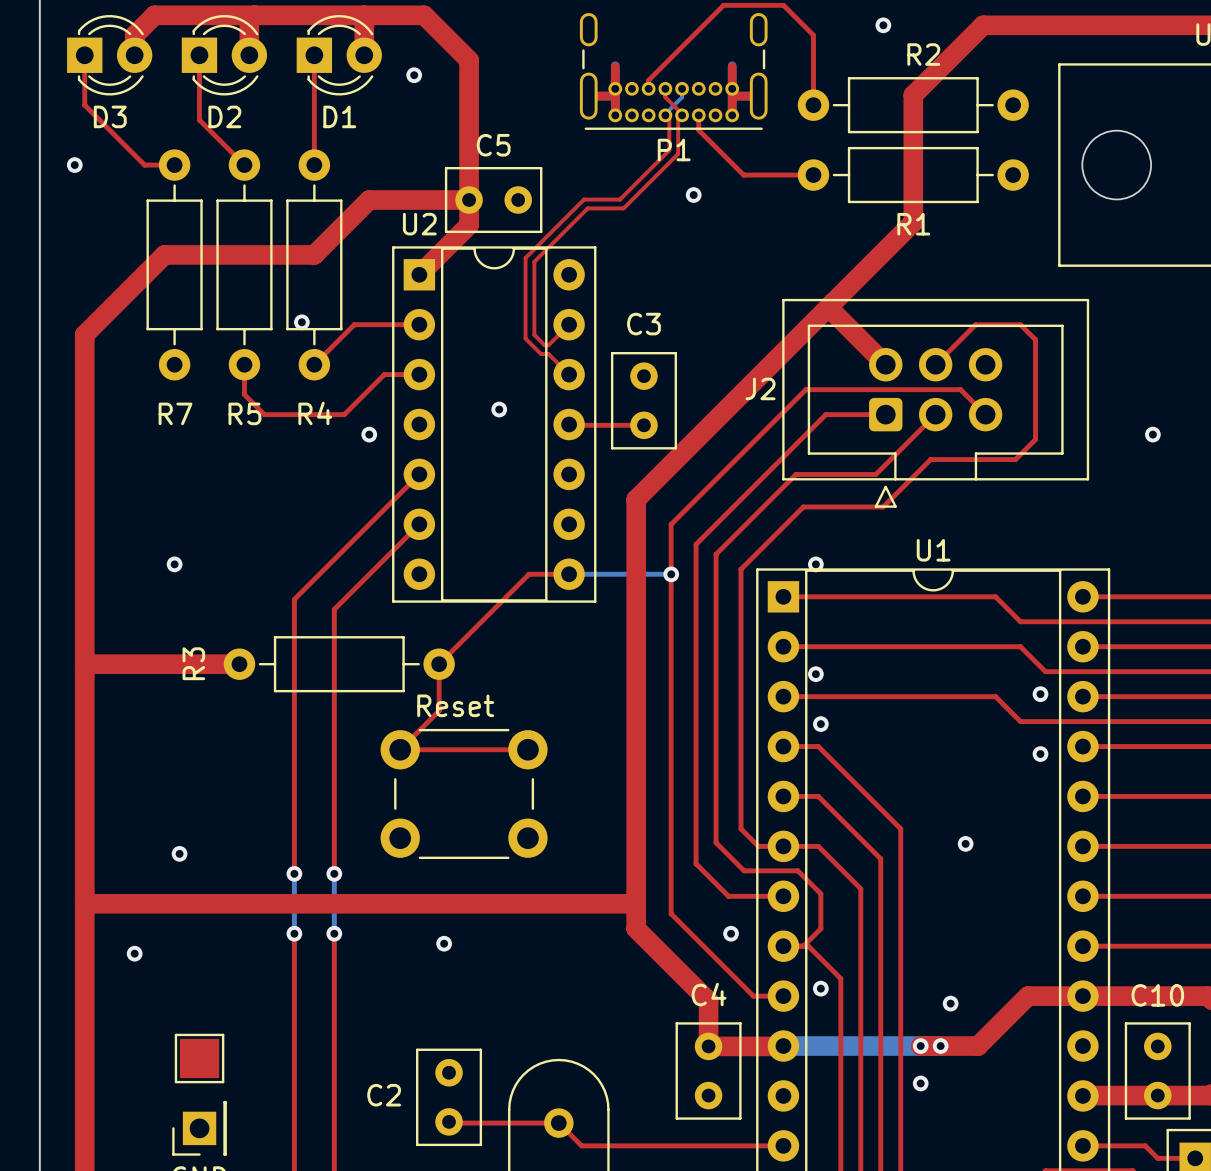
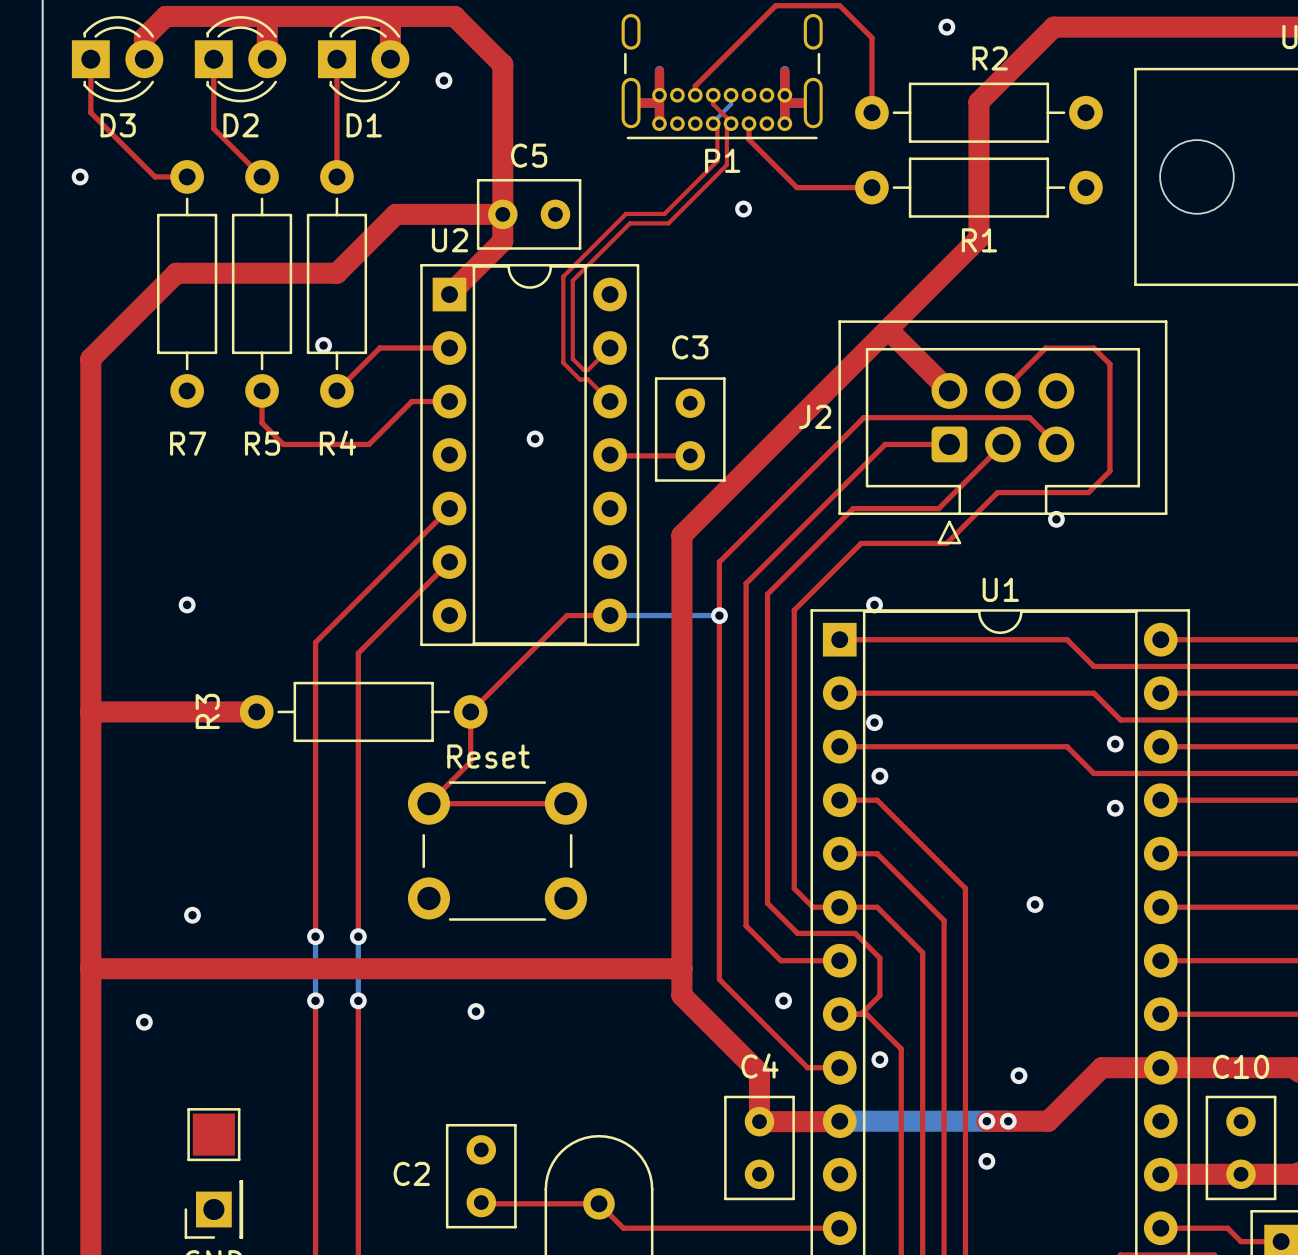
via: (369, 434) -> none
via: (1152, 434) -> none
via: none -> (1056, 519)

